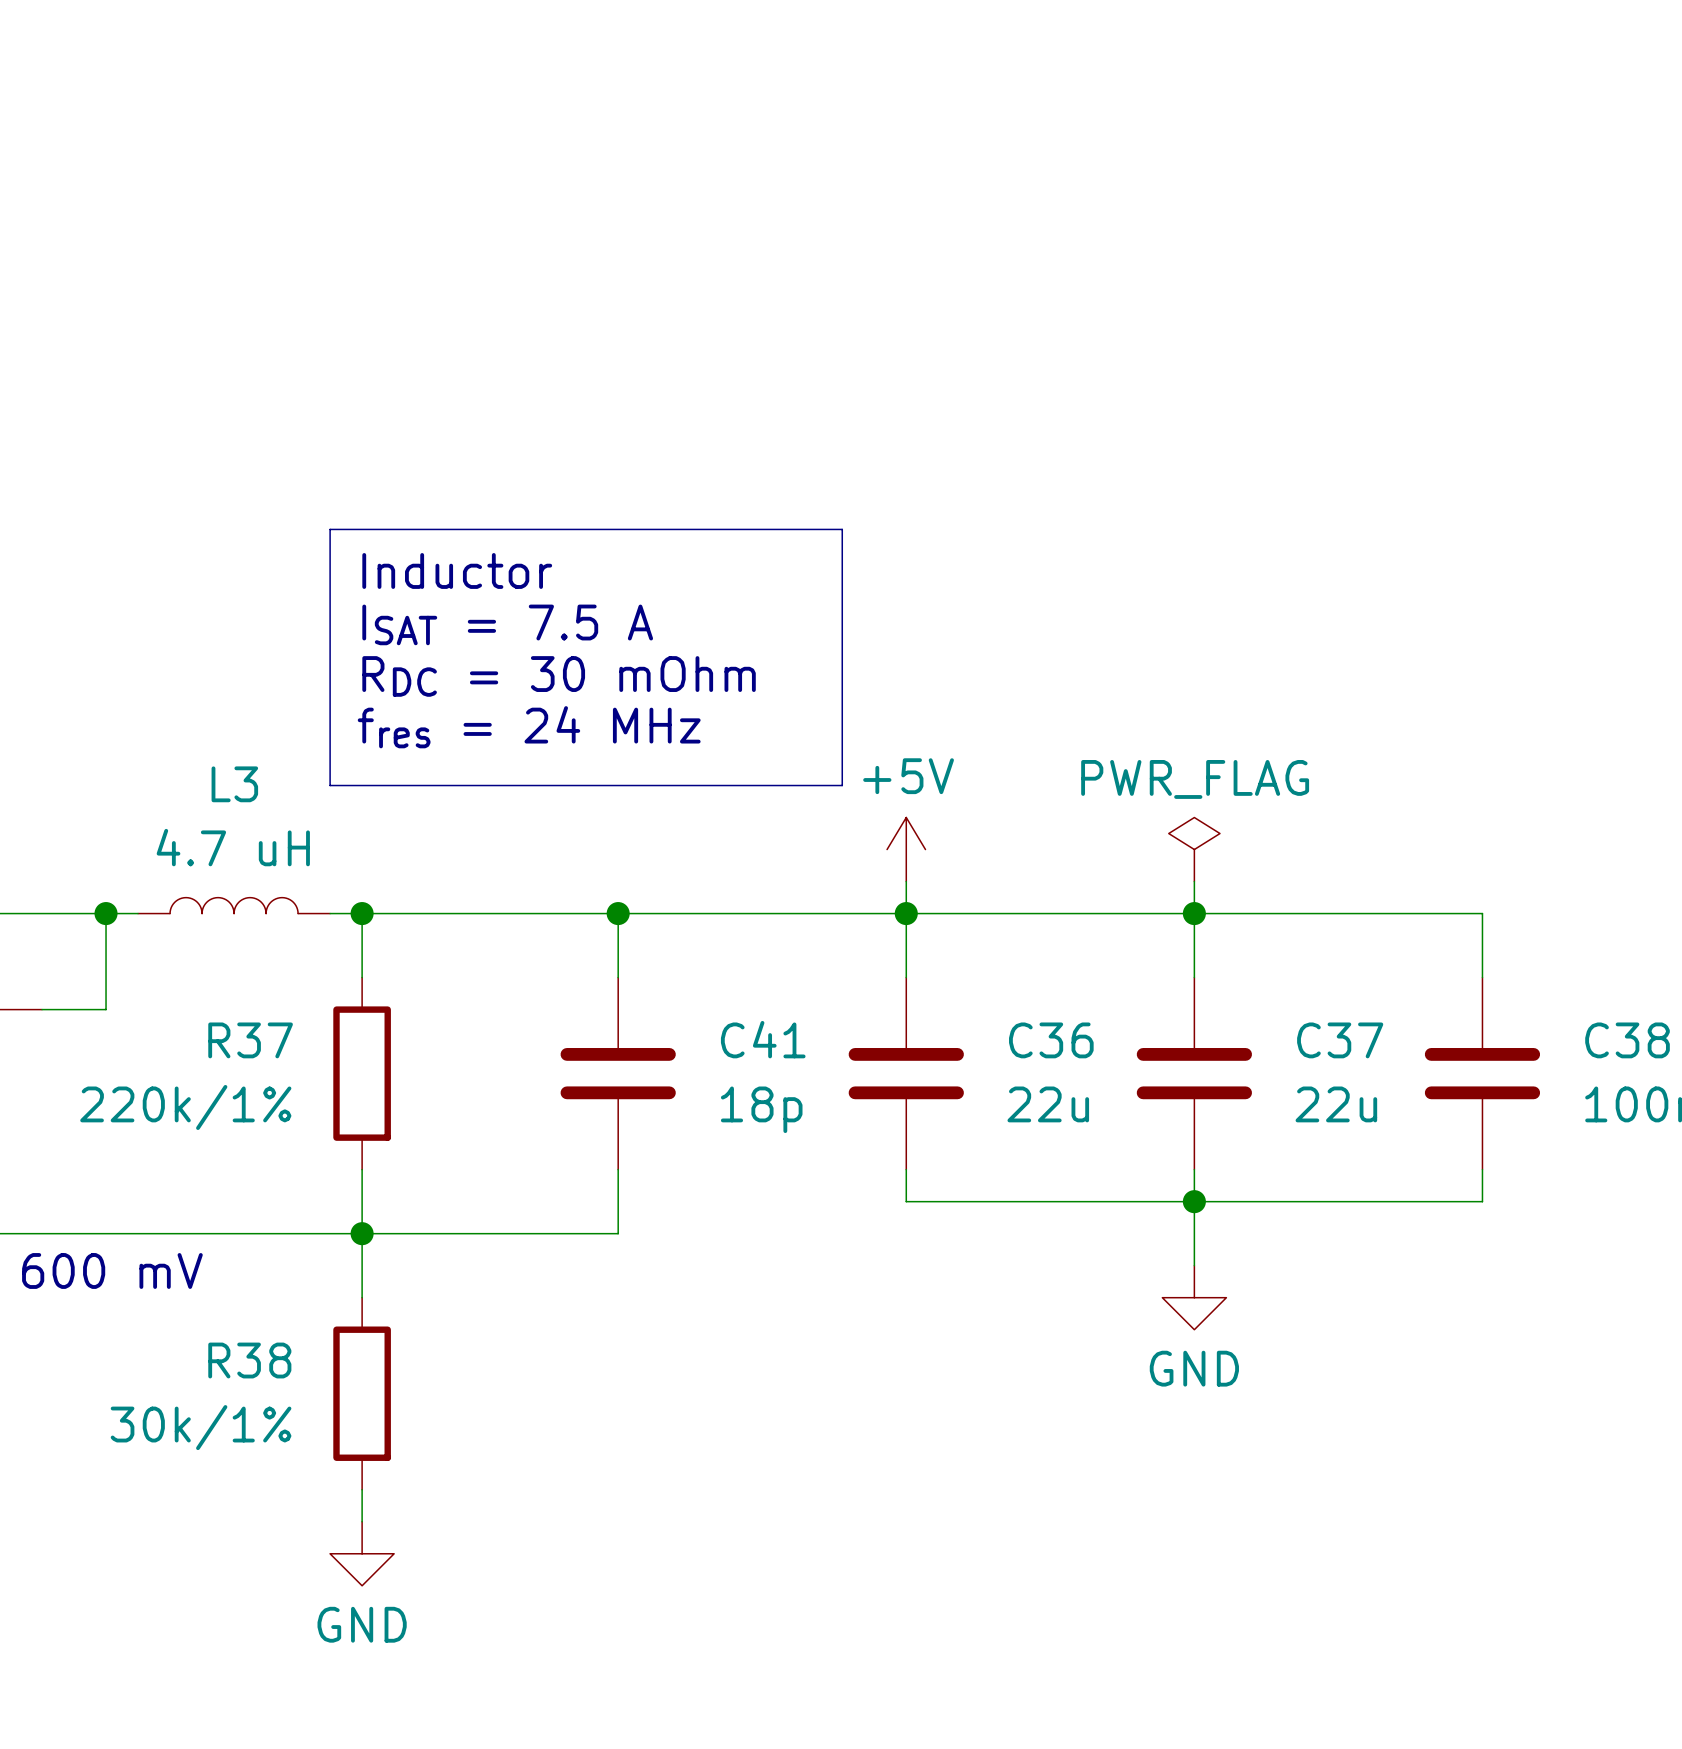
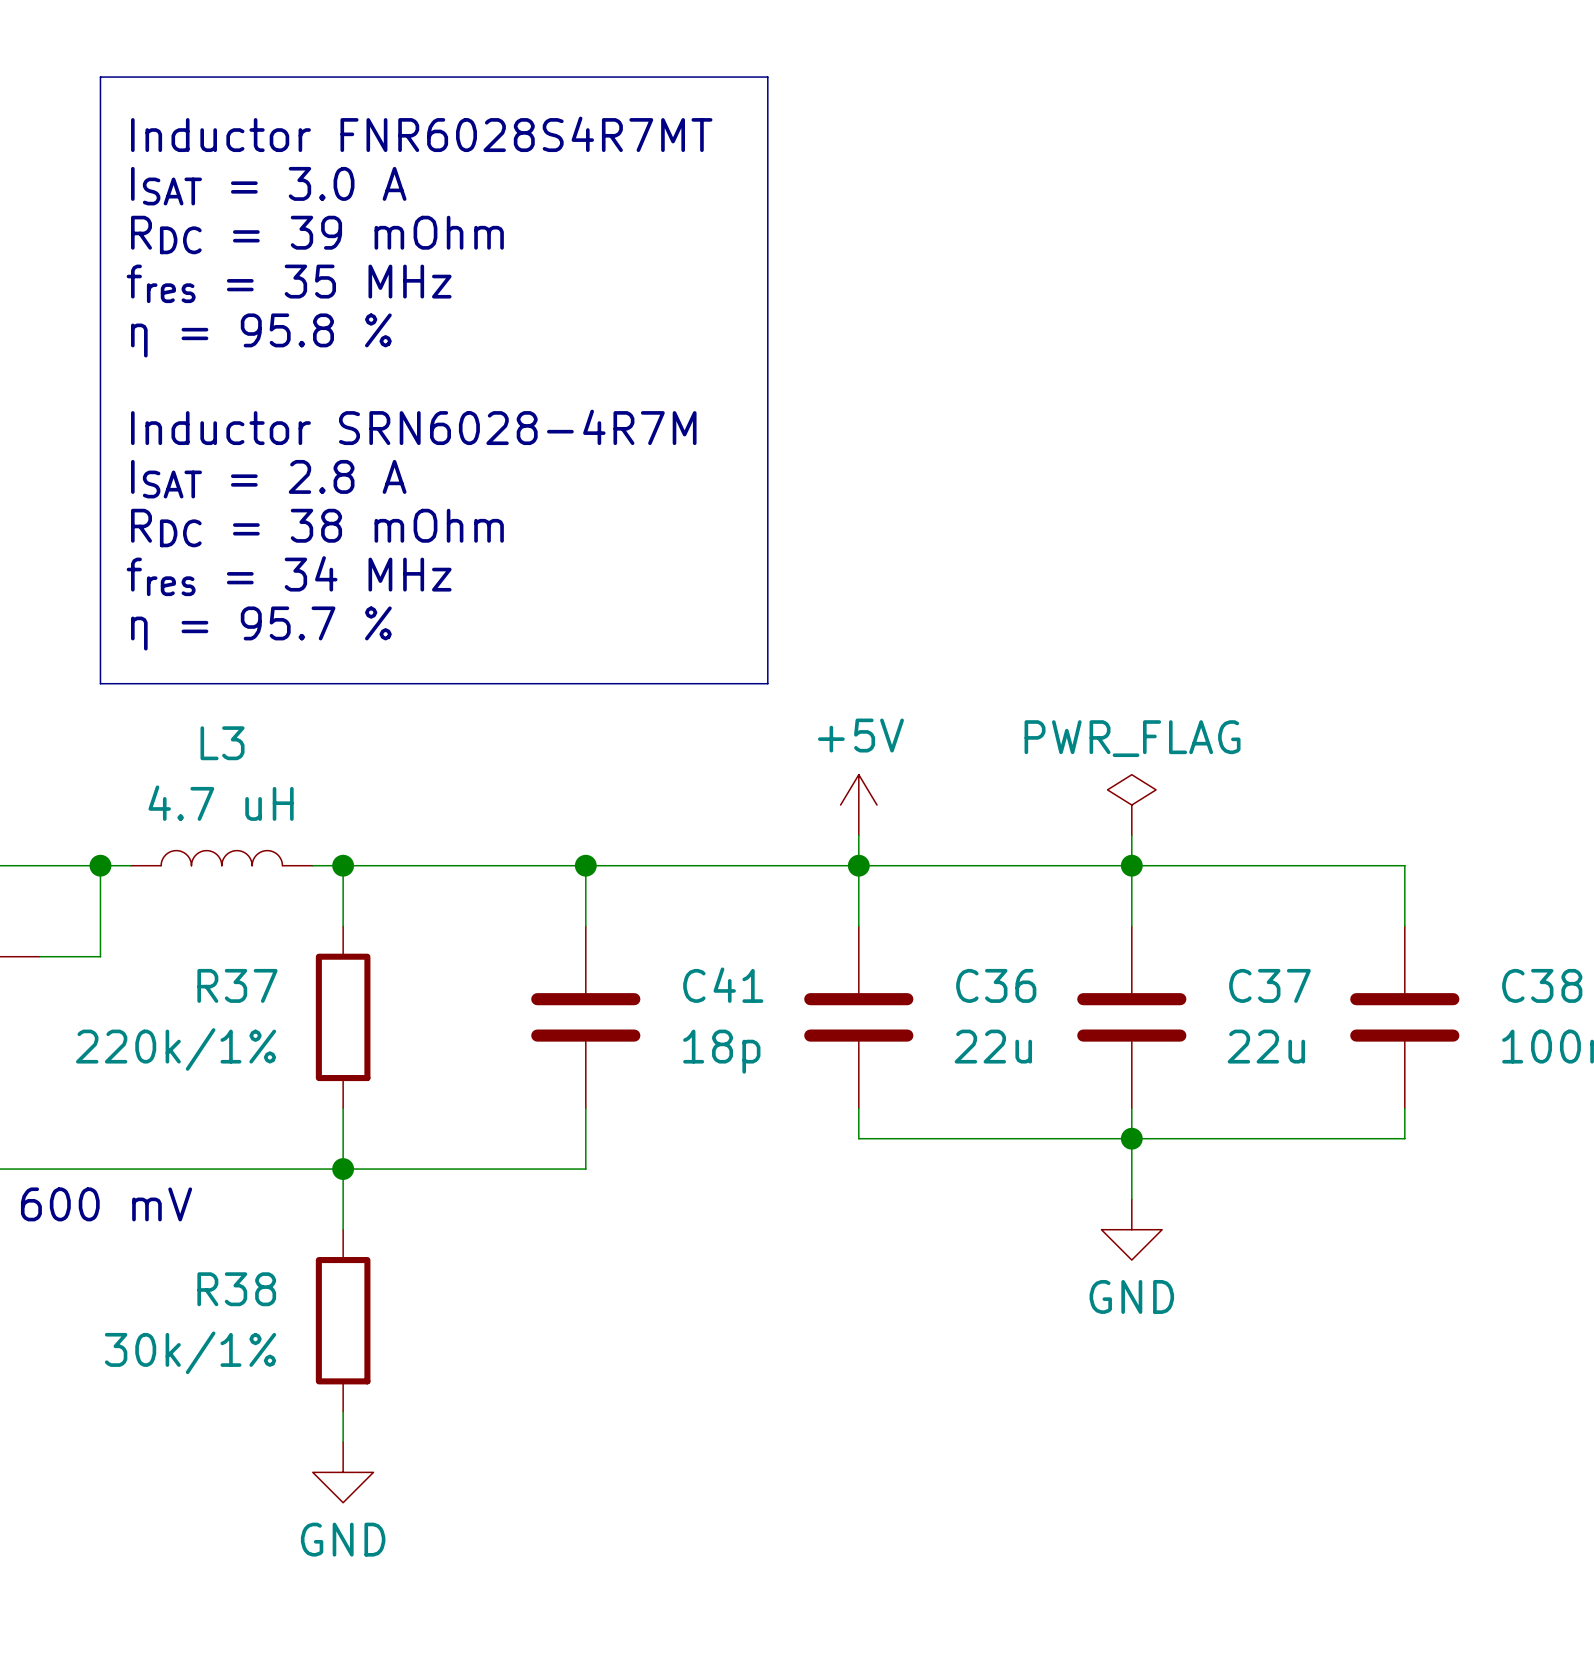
line: none -> (100, 77) (767, 77) (767, 683) (100, 683) (100, 77)
text: none -> Inductor FNR6028S4R7MT (421, 134)
text: none -> ISAT = 3.0 A (268, 186)
text: none -> RDC = 39 mOhm (317, 235)
text: none -> fres = 35 MHz (289, 283)
text: none -> η = 95.8 % (261, 335)
text: none -> Inductor SRN6028-4R7M (413, 427)
text: none -> ISAT = 2.8 A (268, 479)
line: (330, 529) (842, 529) (842, 785) (330, 785) (330, 529) -> none
text: none -> RDC = 38 mOhm (317, 528)
text: Inductor (457, 570) -> none
text: none -> fres = 34 MHz (289, 576)
text: ISAT = 7.5 A (507, 624) -> none
text: none -> η = 95.7 % (261, 628)
text: RDC = 30 mOhm (559, 676) -> none
text: fres = 24 MHz (529, 727) -> none

